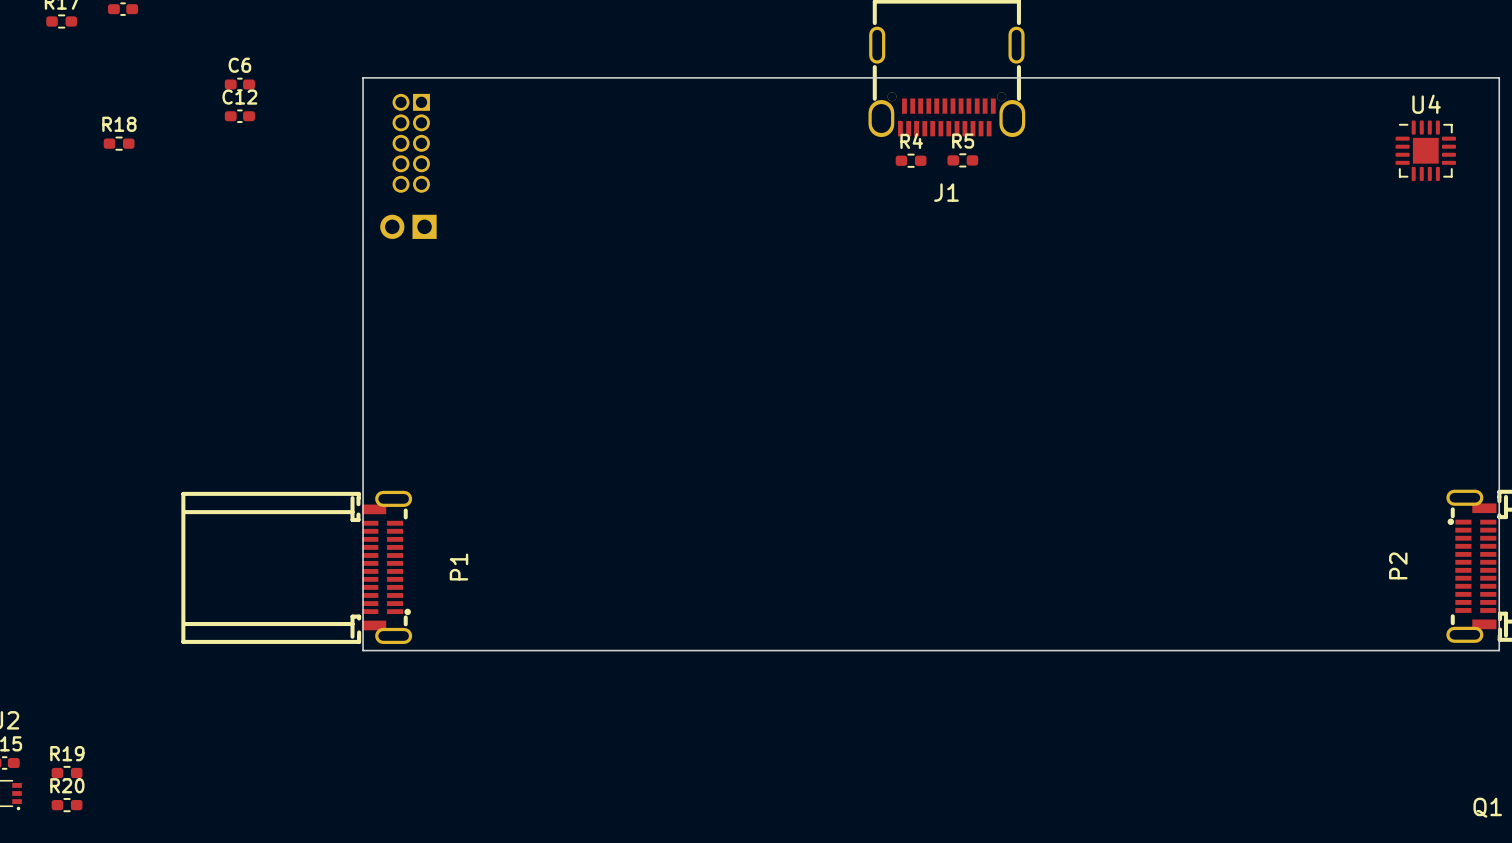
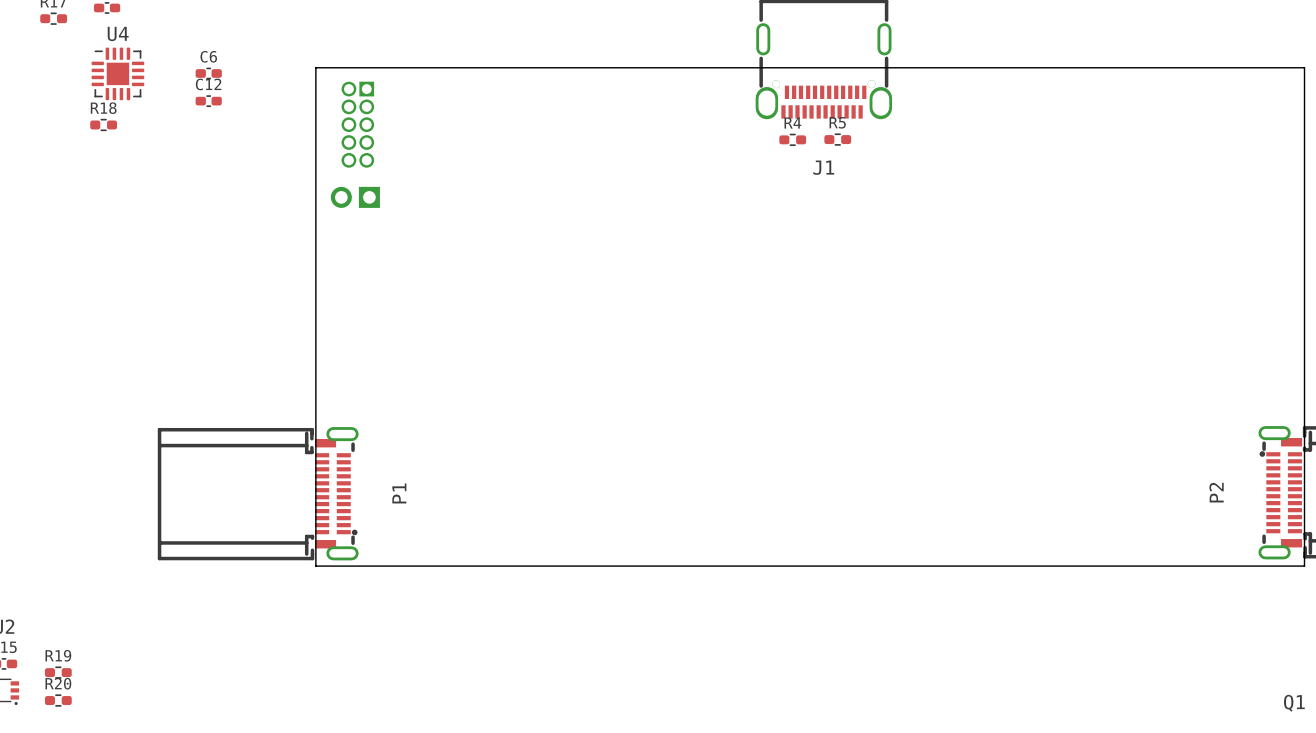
U4 position: (1425, 150) -> (117, 73)

